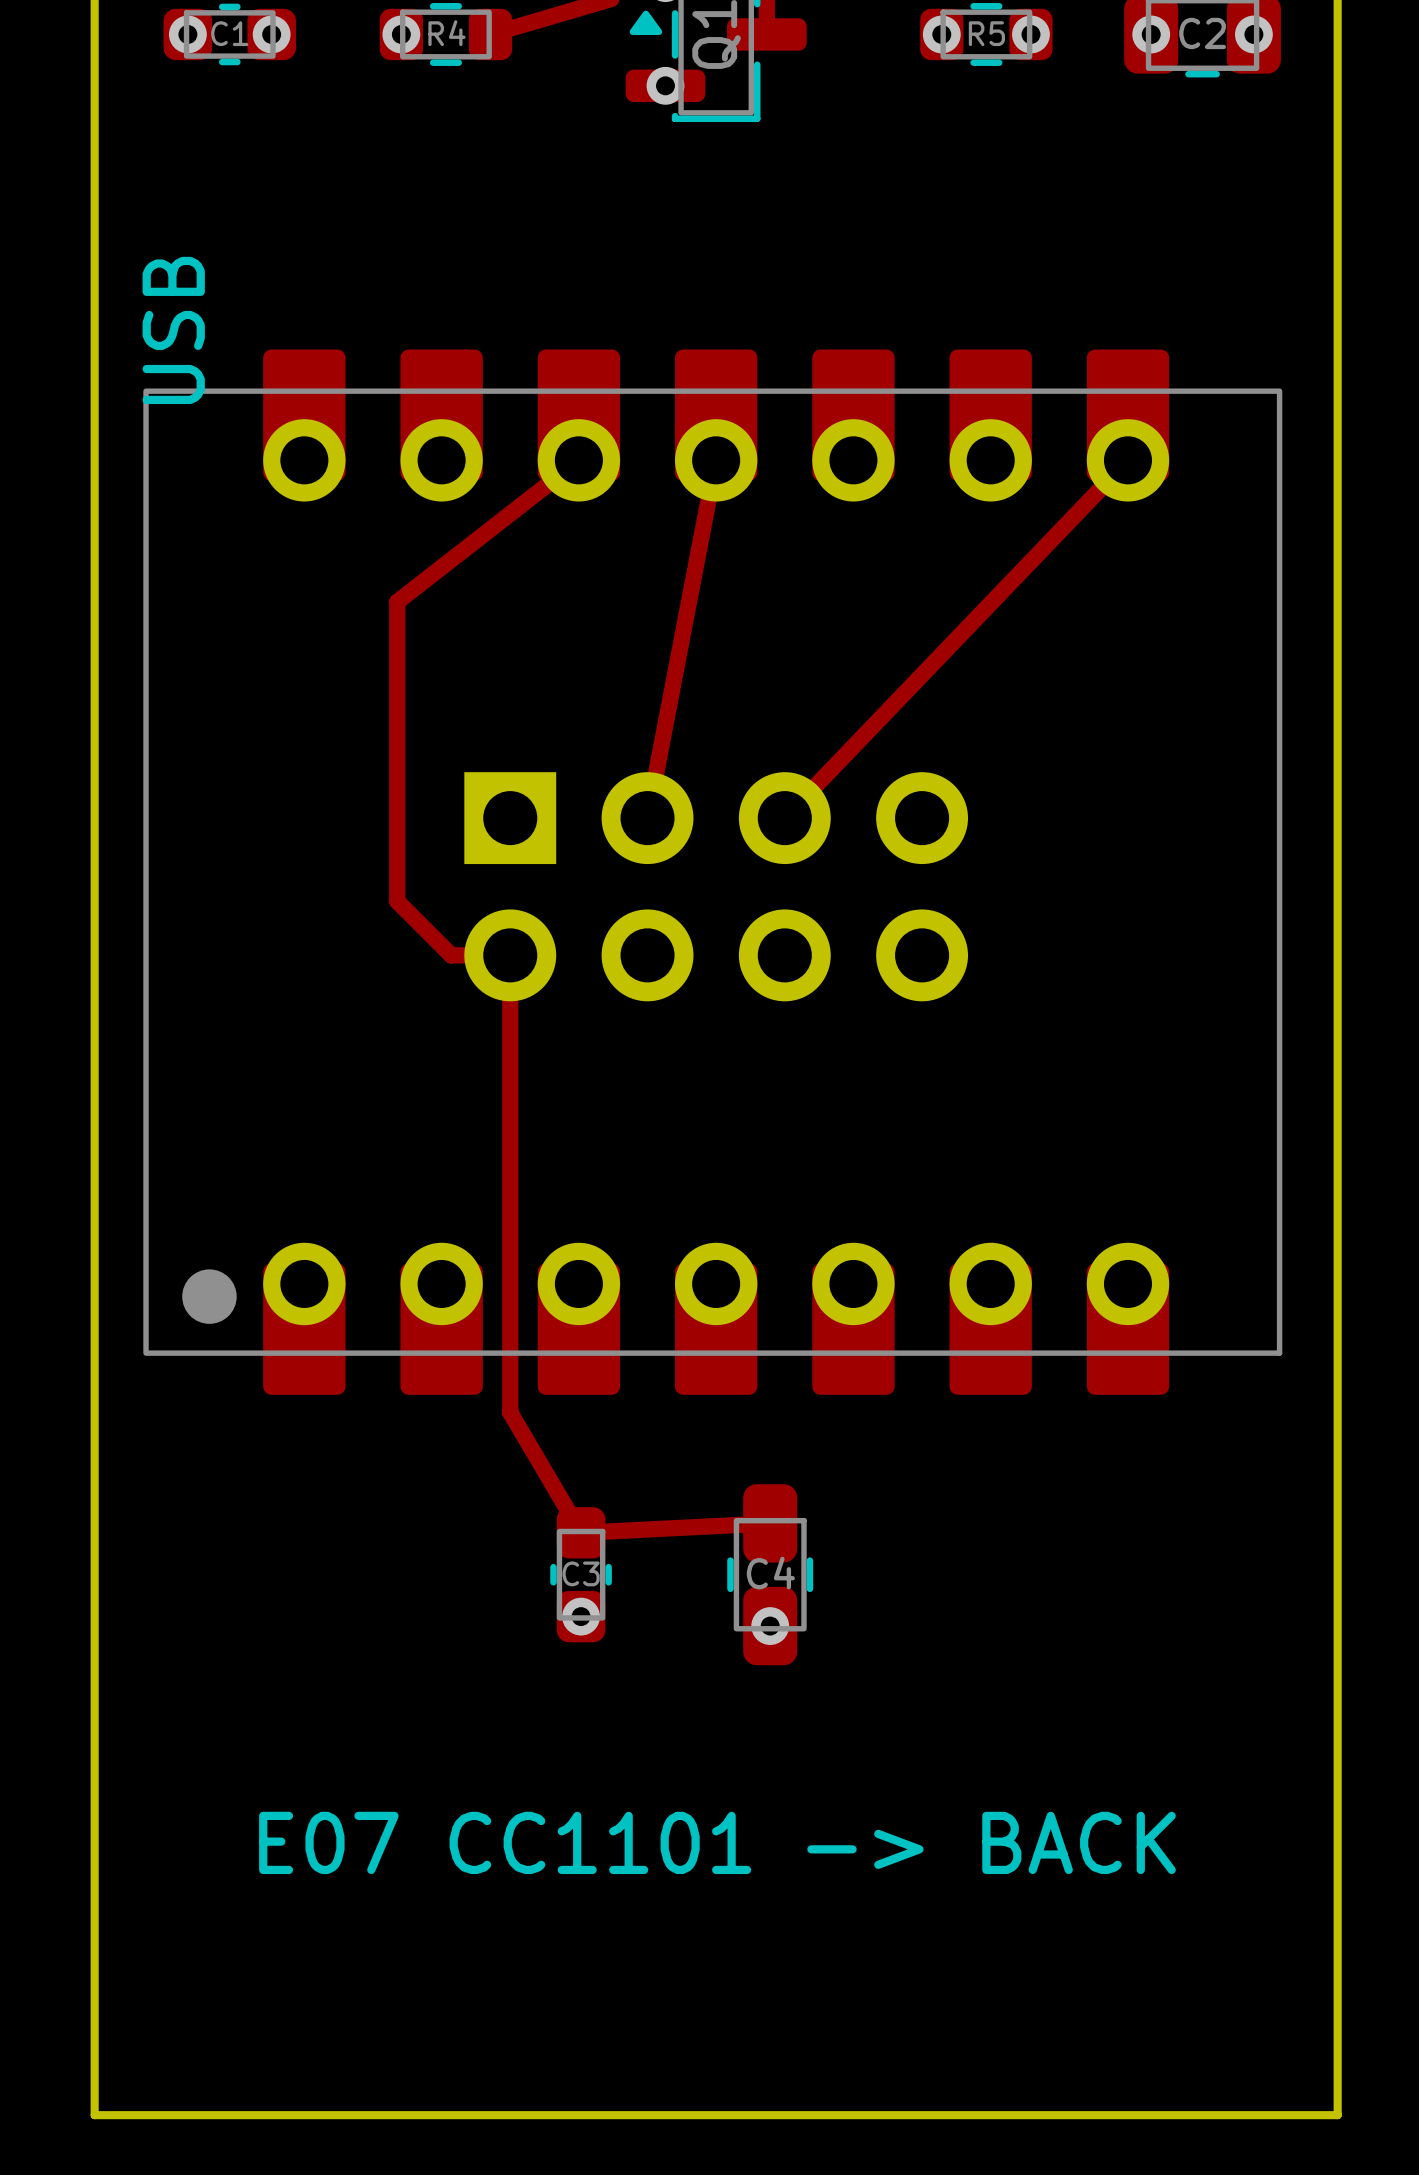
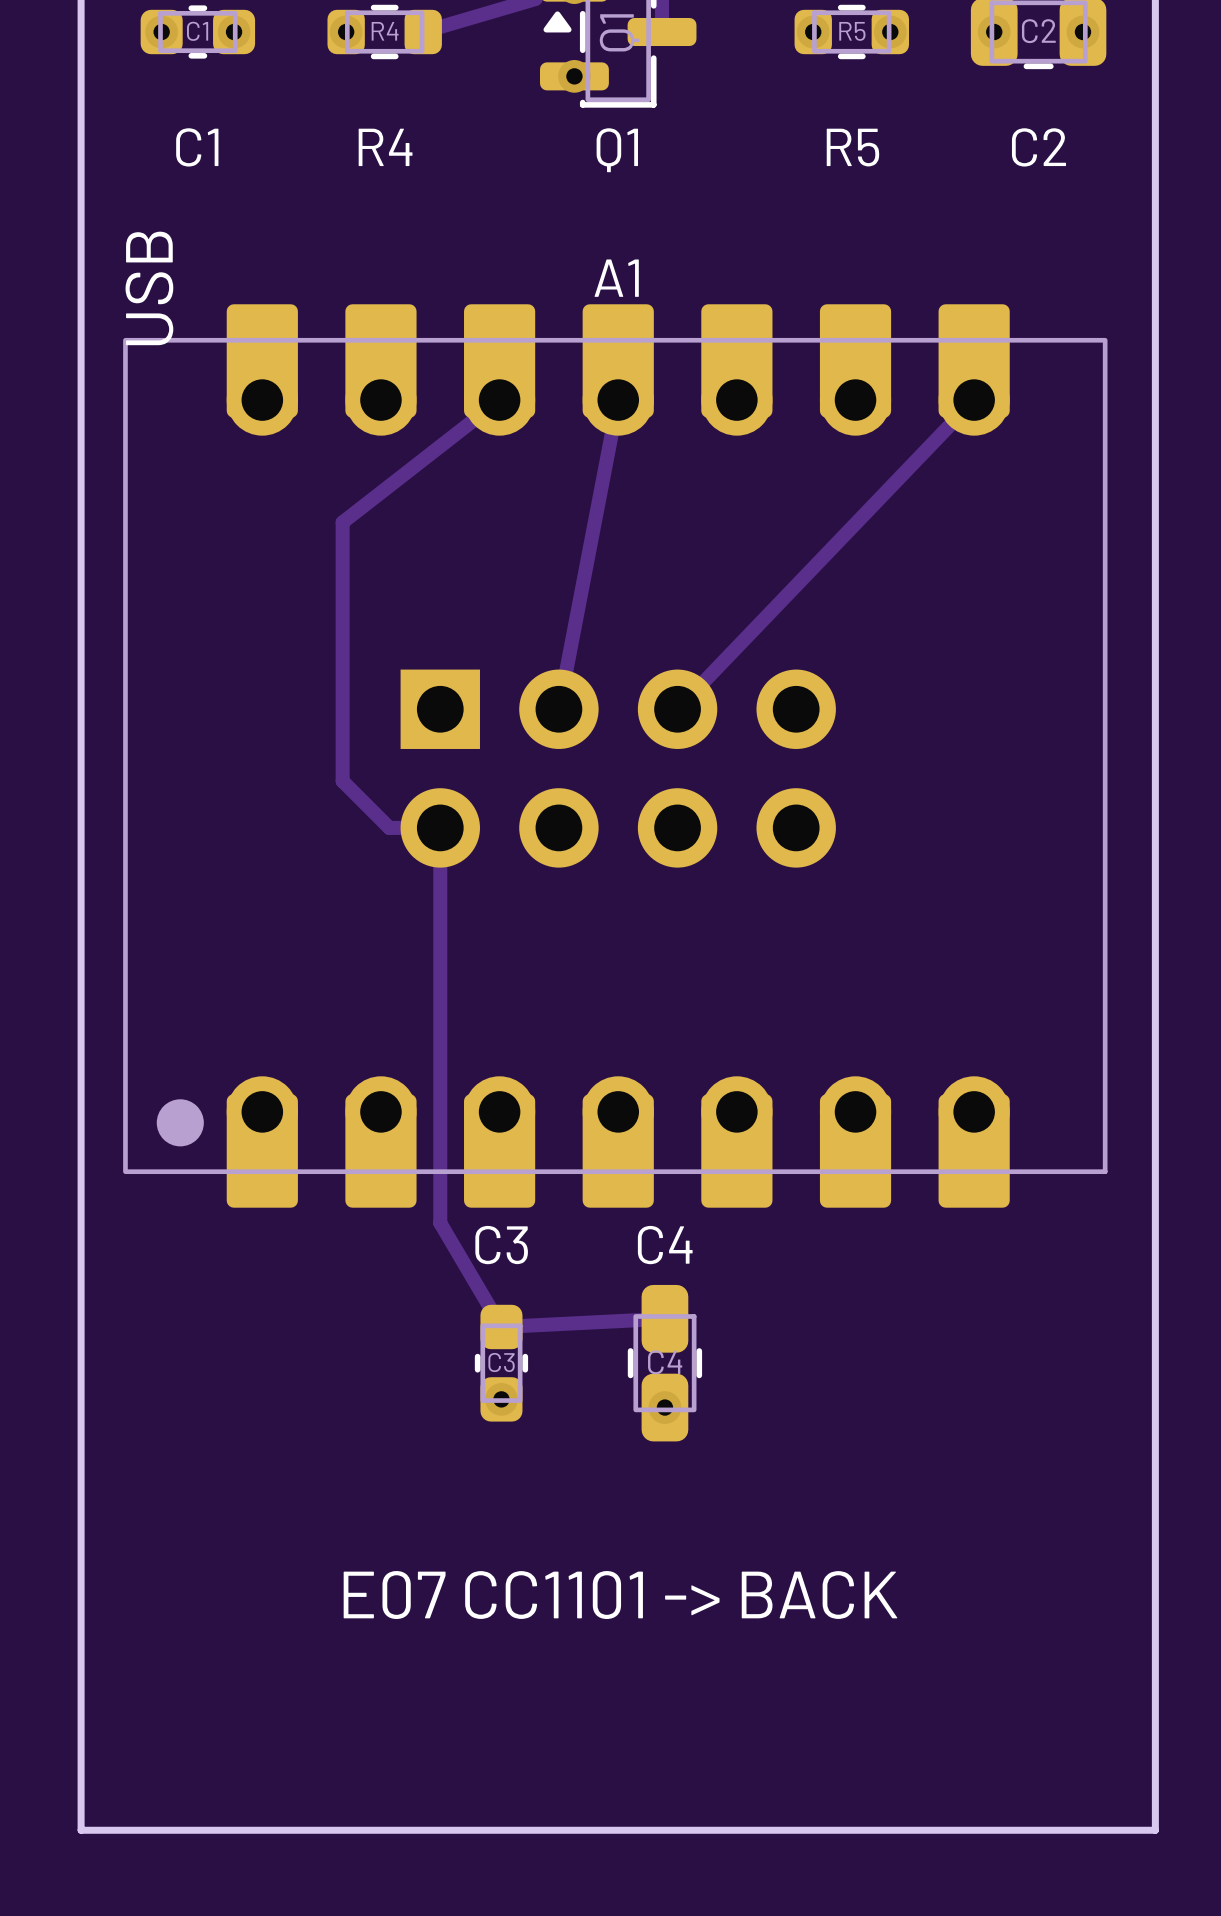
text: none -> R4 (385, 147)
text: none -> C1 (197, 147)
text: none -> R5 (852, 147)
text: none -> C2 (1038, 147)
text: none -> Q1 (617, 150)
text: none -> A1 (616, 278)
text: none -> C4 (665, 1245)
text: none -> C3 (501, 1245)

